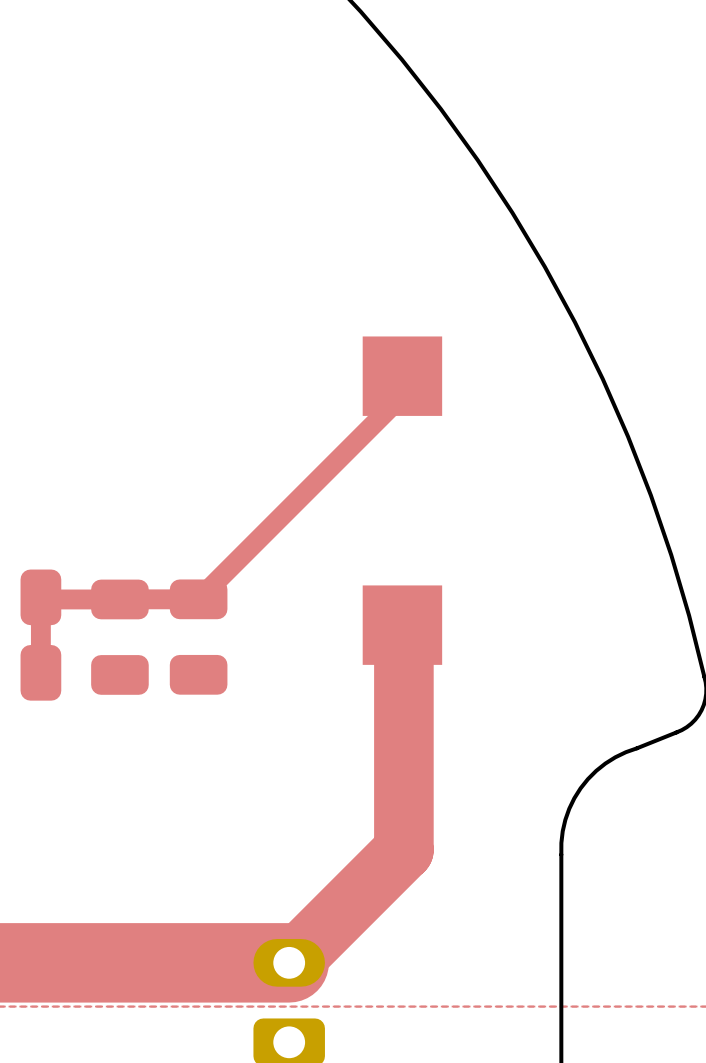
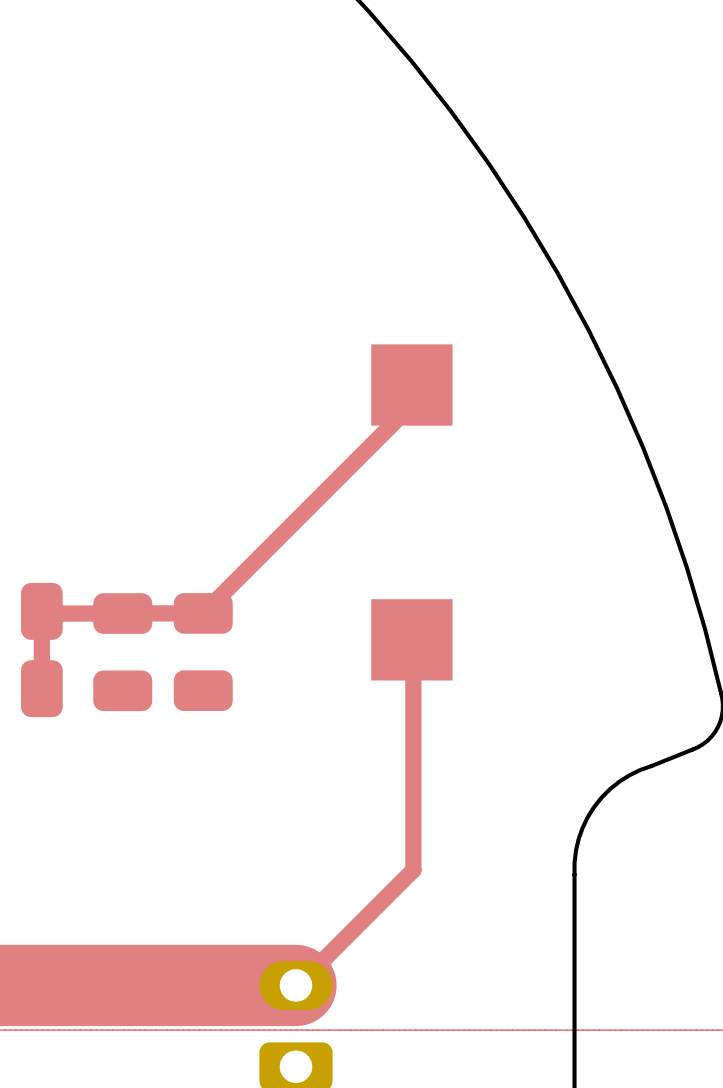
top track width: thick (402, 376) (402, 395) (198, 599) (43, 599) (40, 597) (40, 672) -> thin (411, 385) (411, 404) (203, 613) (44, 613) (41, 611) (41, 688)
top track width: thick (403, 625) (403, 850) (289, 962) -> thin (413, 639) (413, 870) (295, 985)

